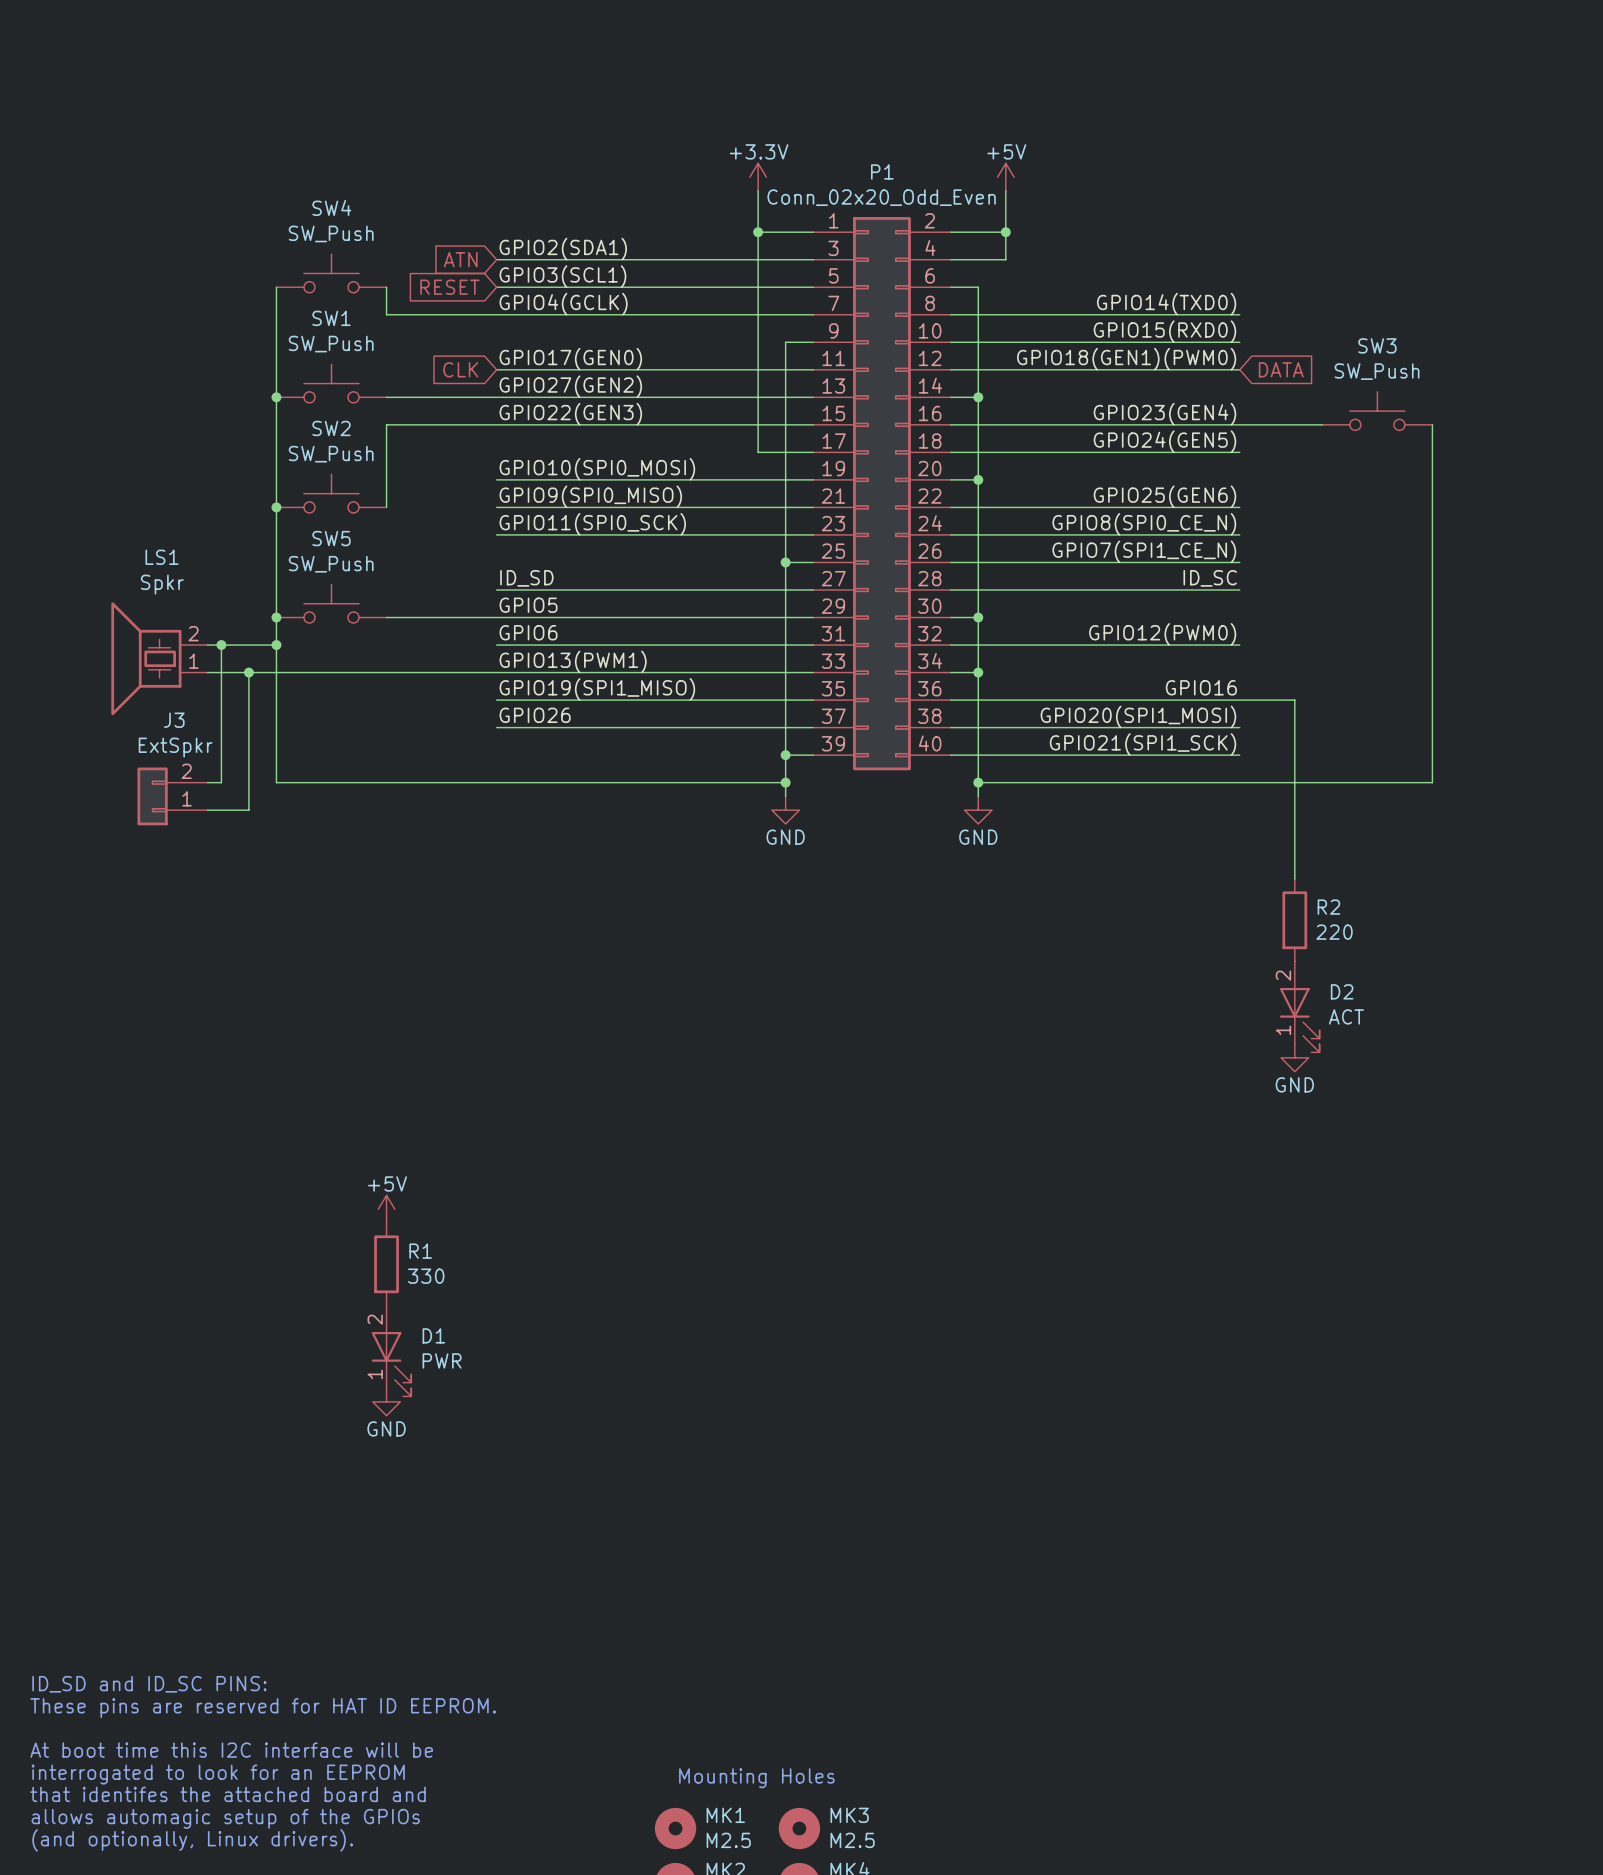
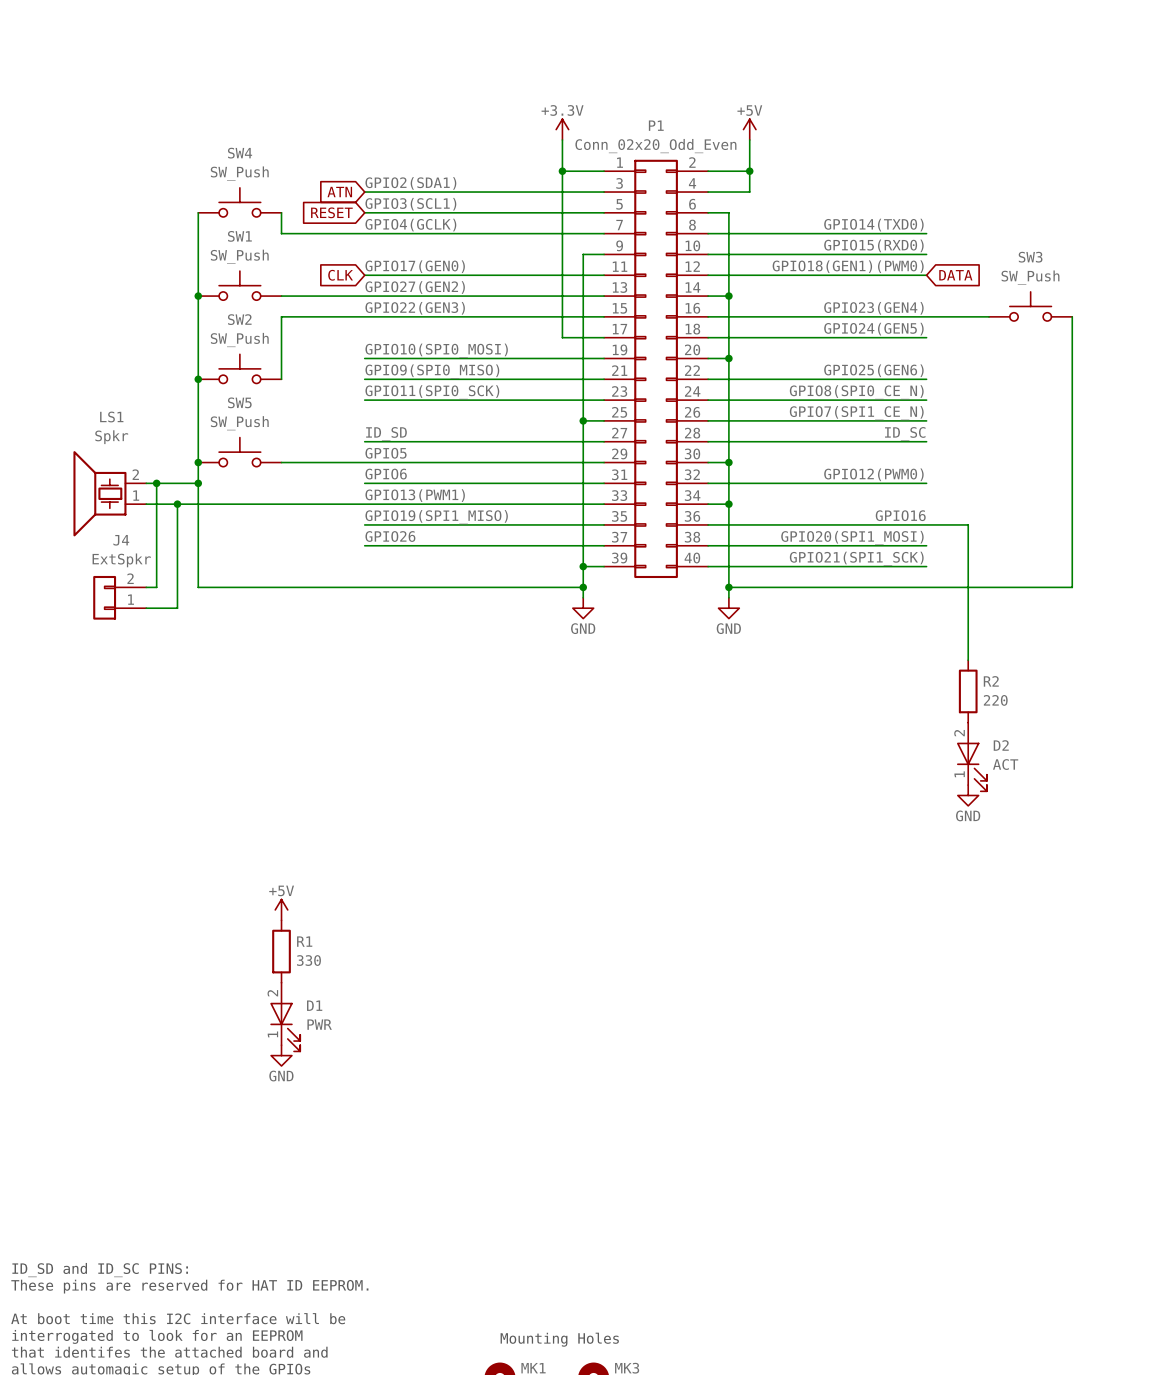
J3 name: J3 (174, 720) -> J4 (121, 540)

